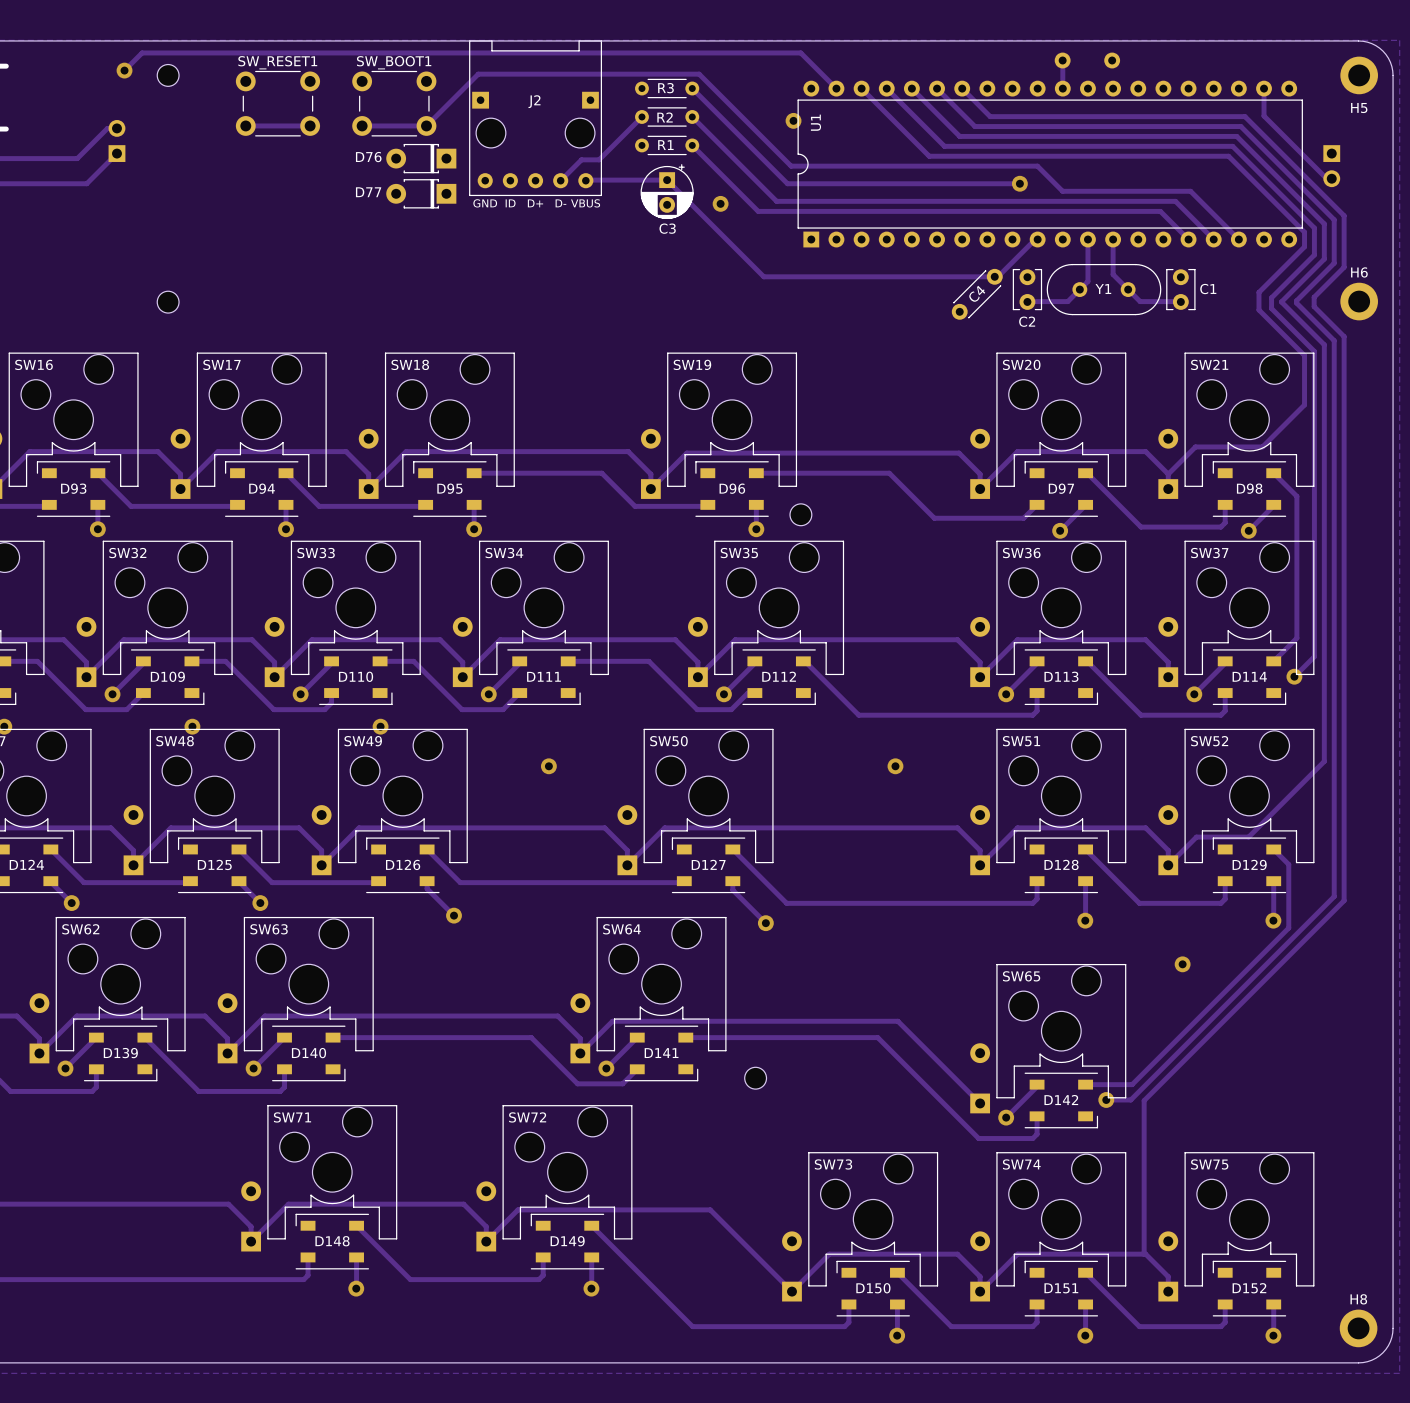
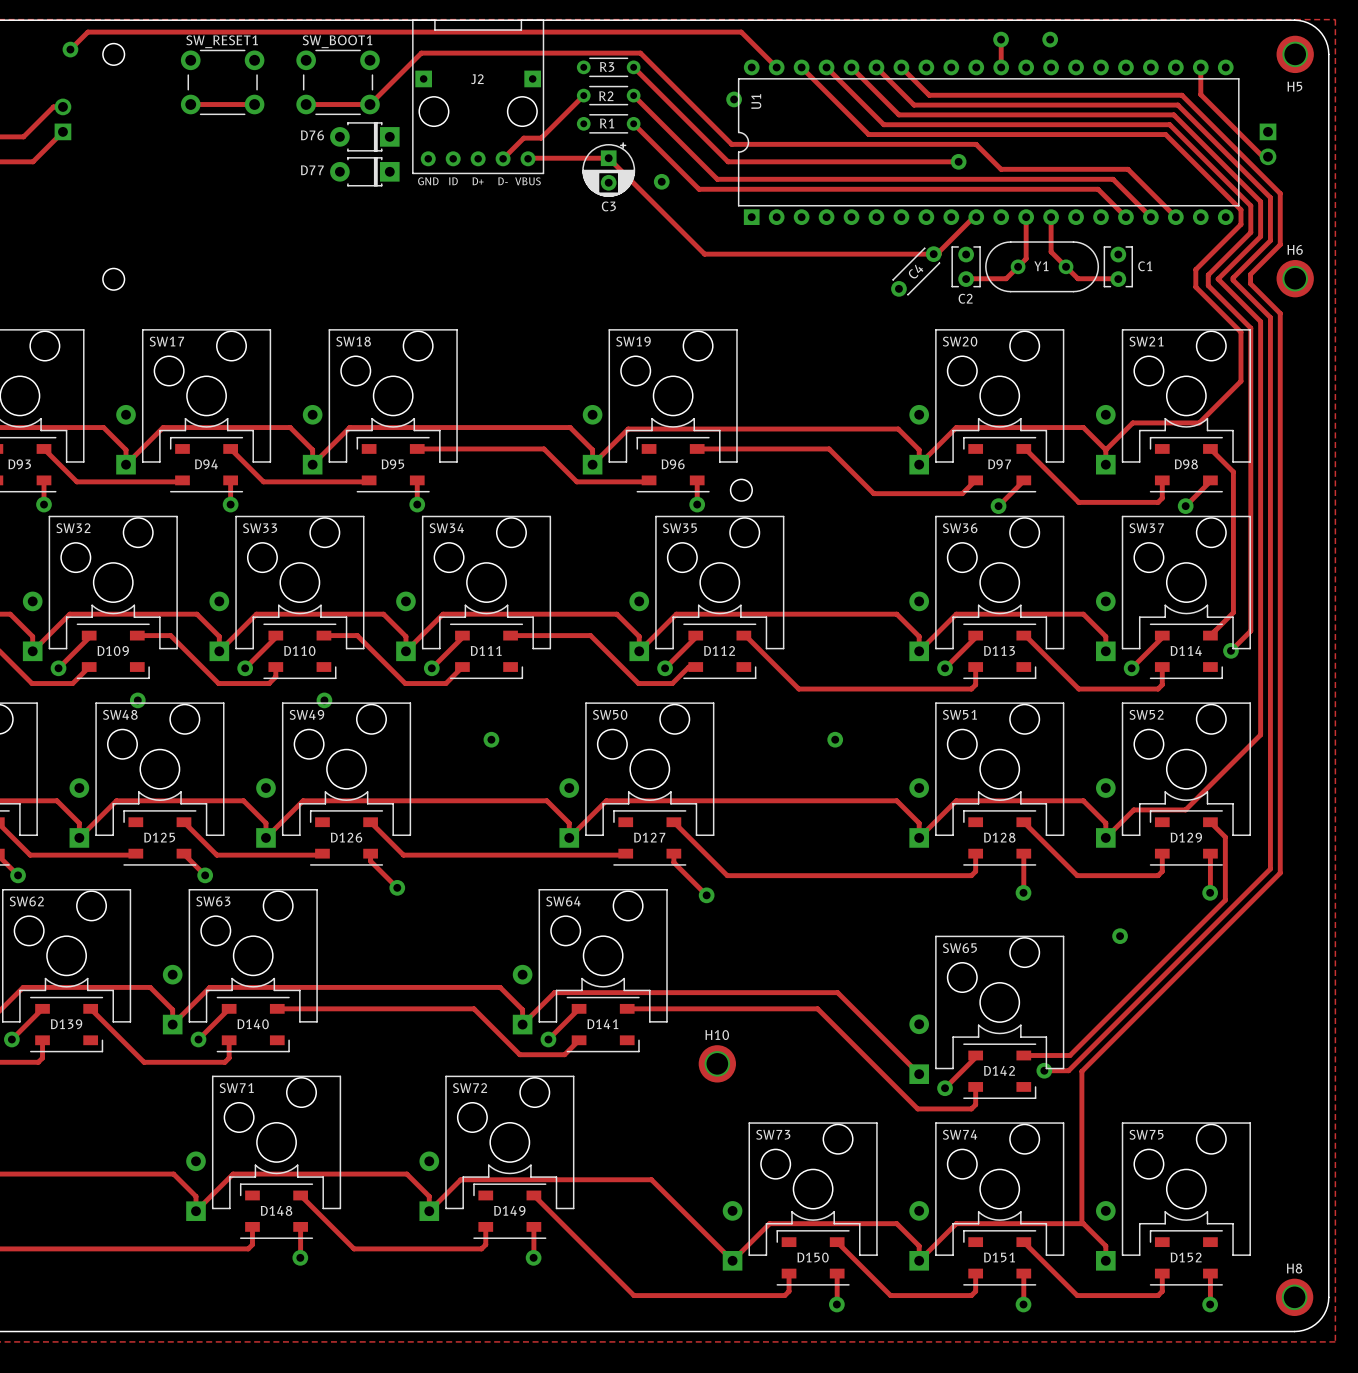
part: (755, 1078) -> none
H10: none -> (717, 1063)

